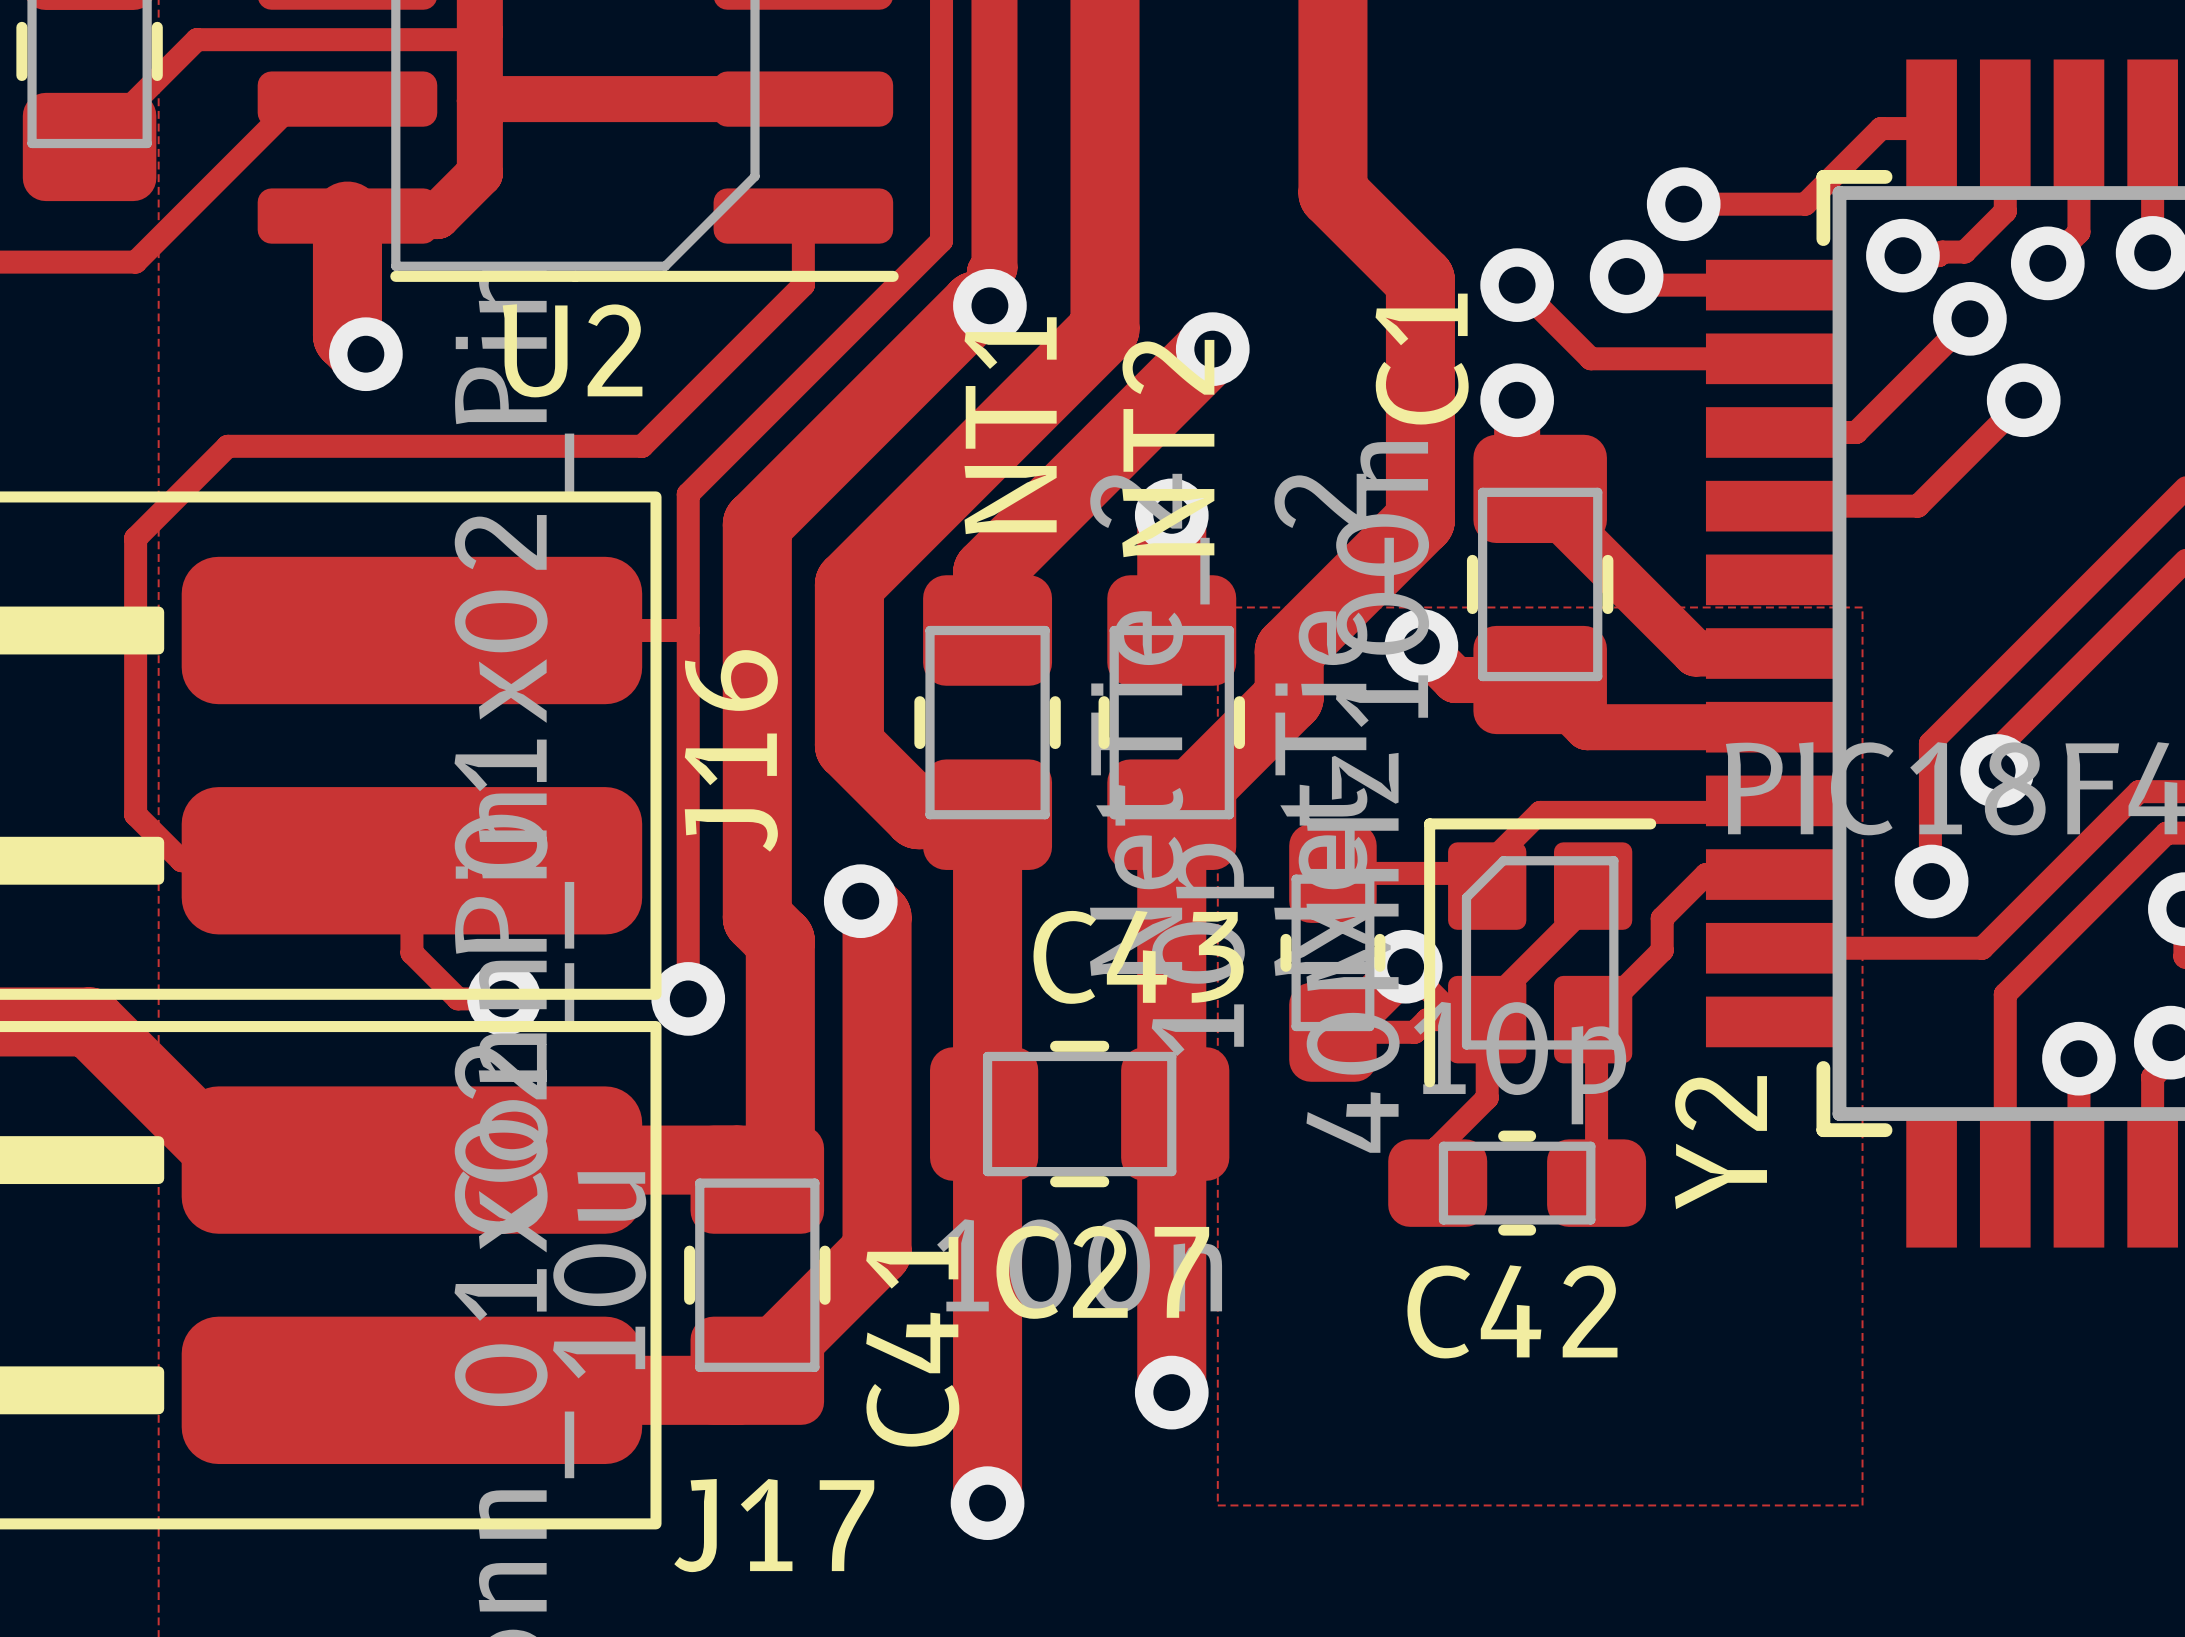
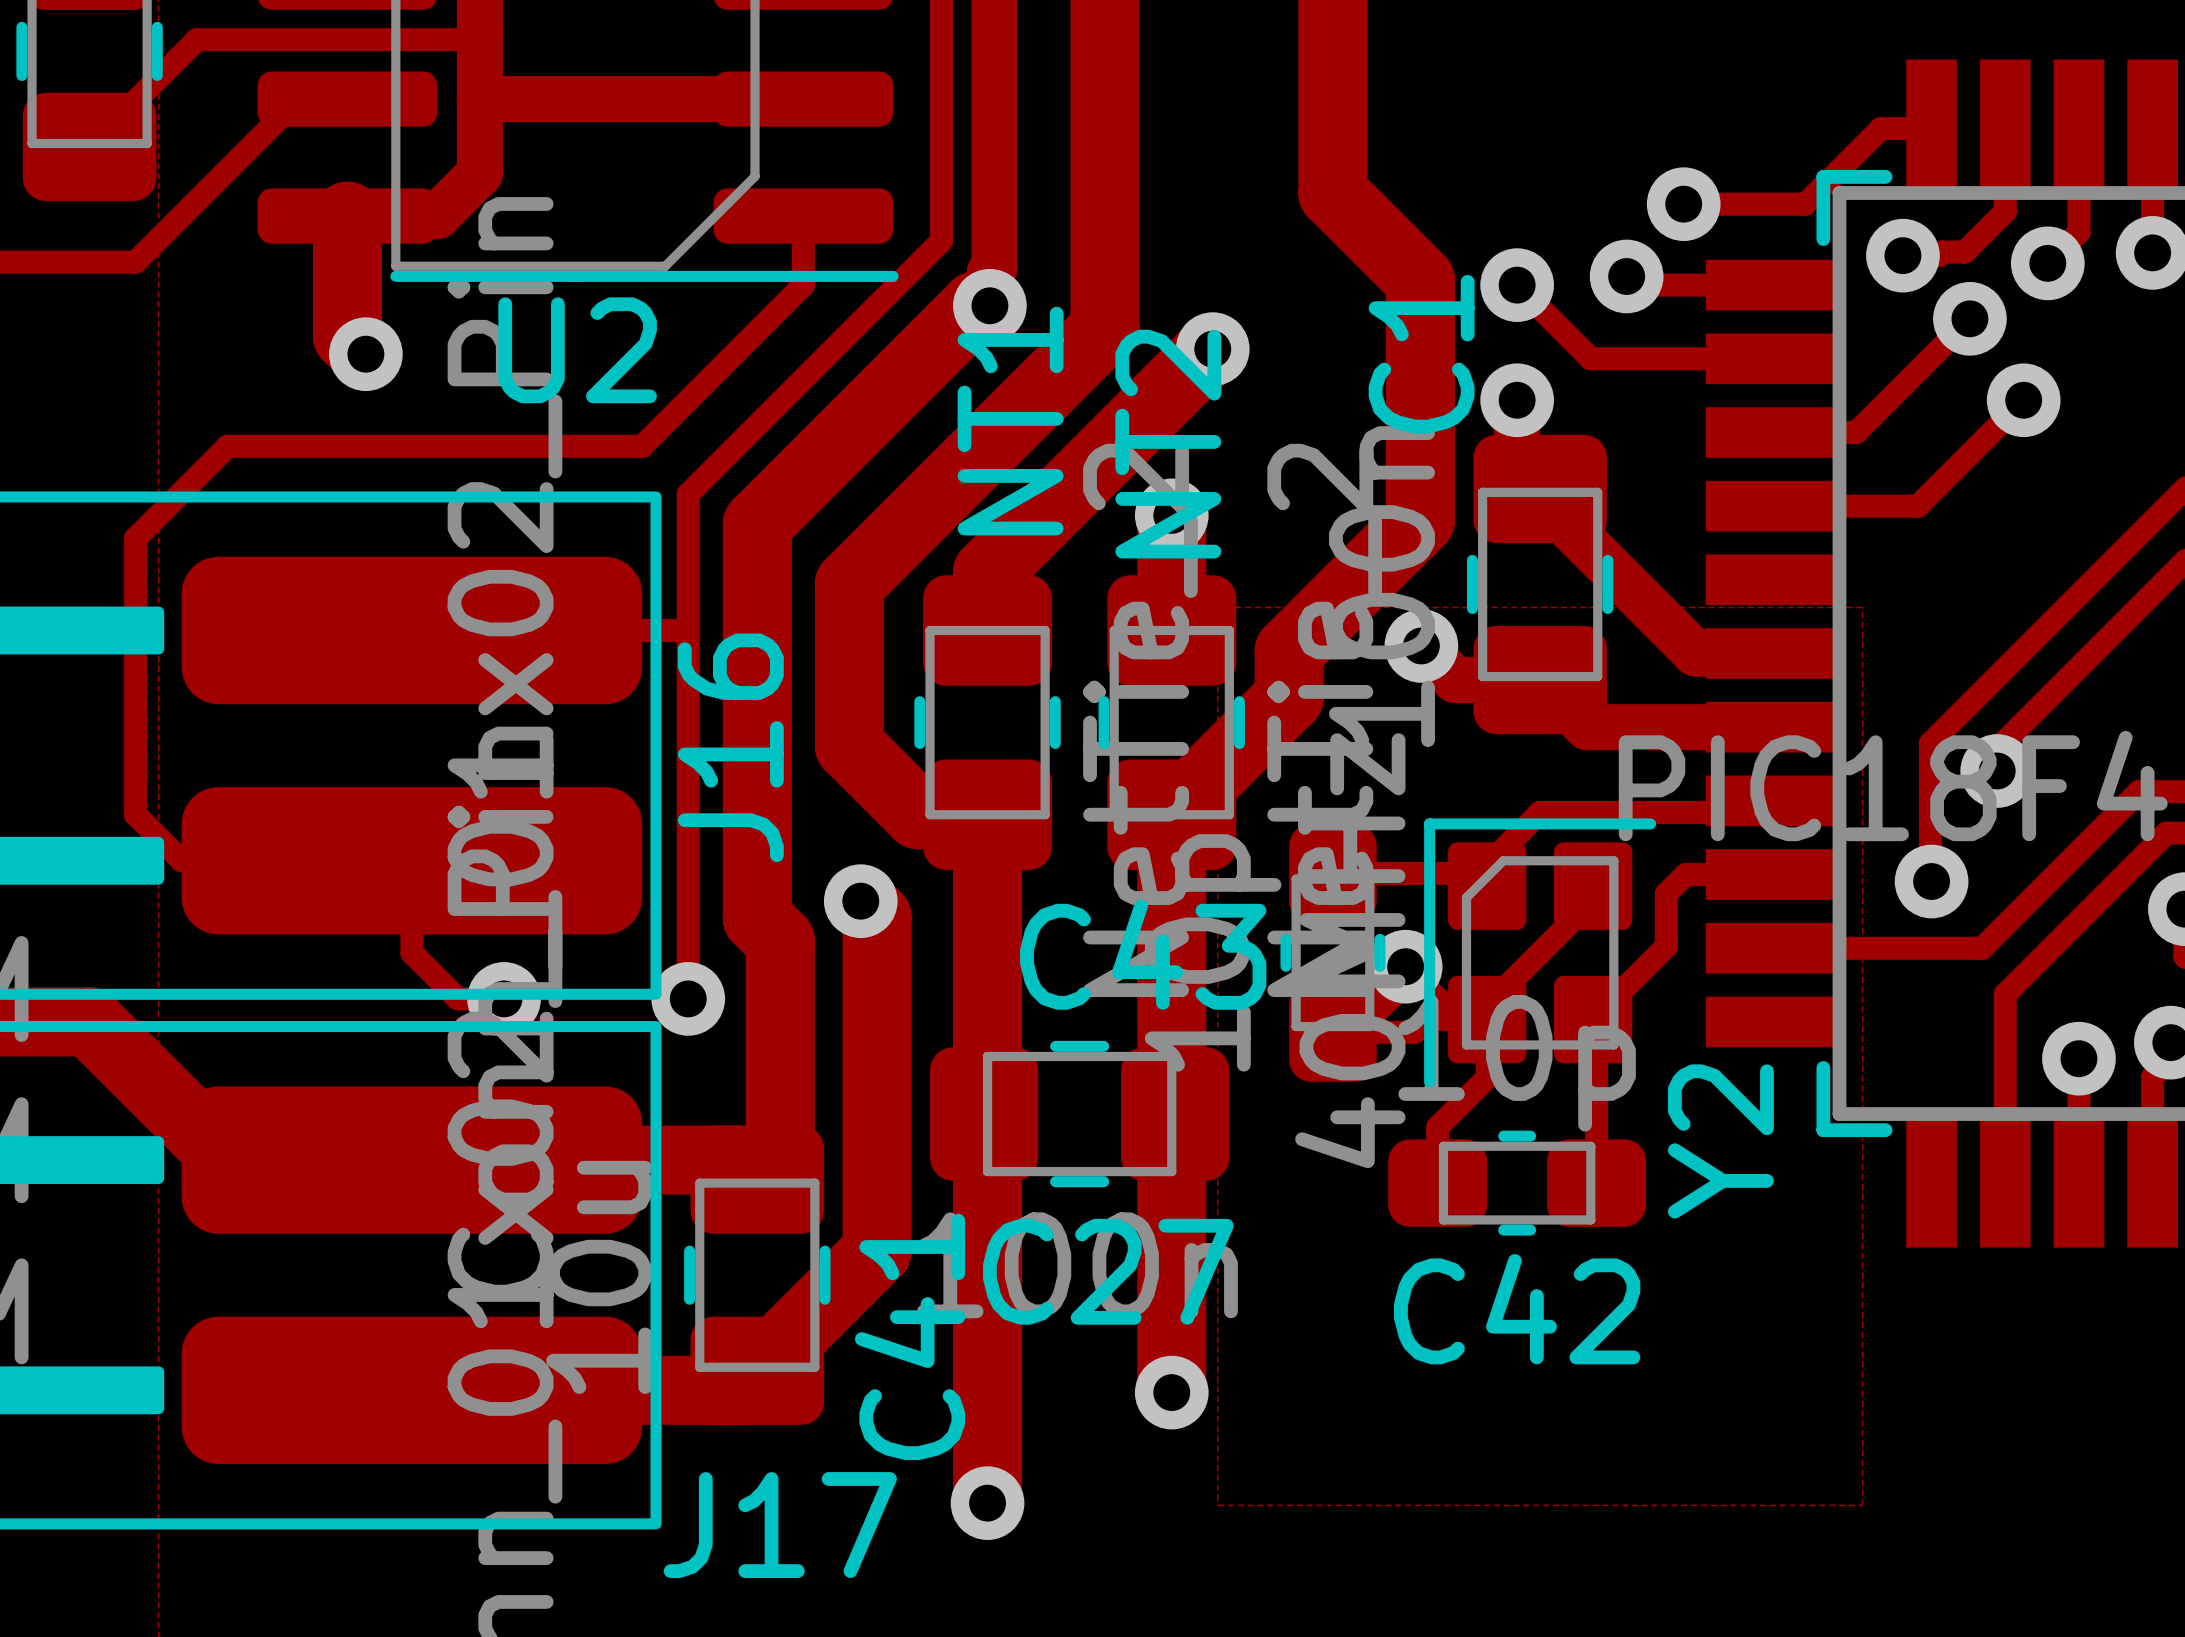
track: (1705, 874) (1662, 918) (1662, 950) -> (1705, 874) (1685, 874) (1666, 893) (1666, 946) (1662, 950)
track: (1487, 1077) (1487, 1097) (1437, 1147) -> (1487, 1077) (1437, 1127) (1437, 1147)

